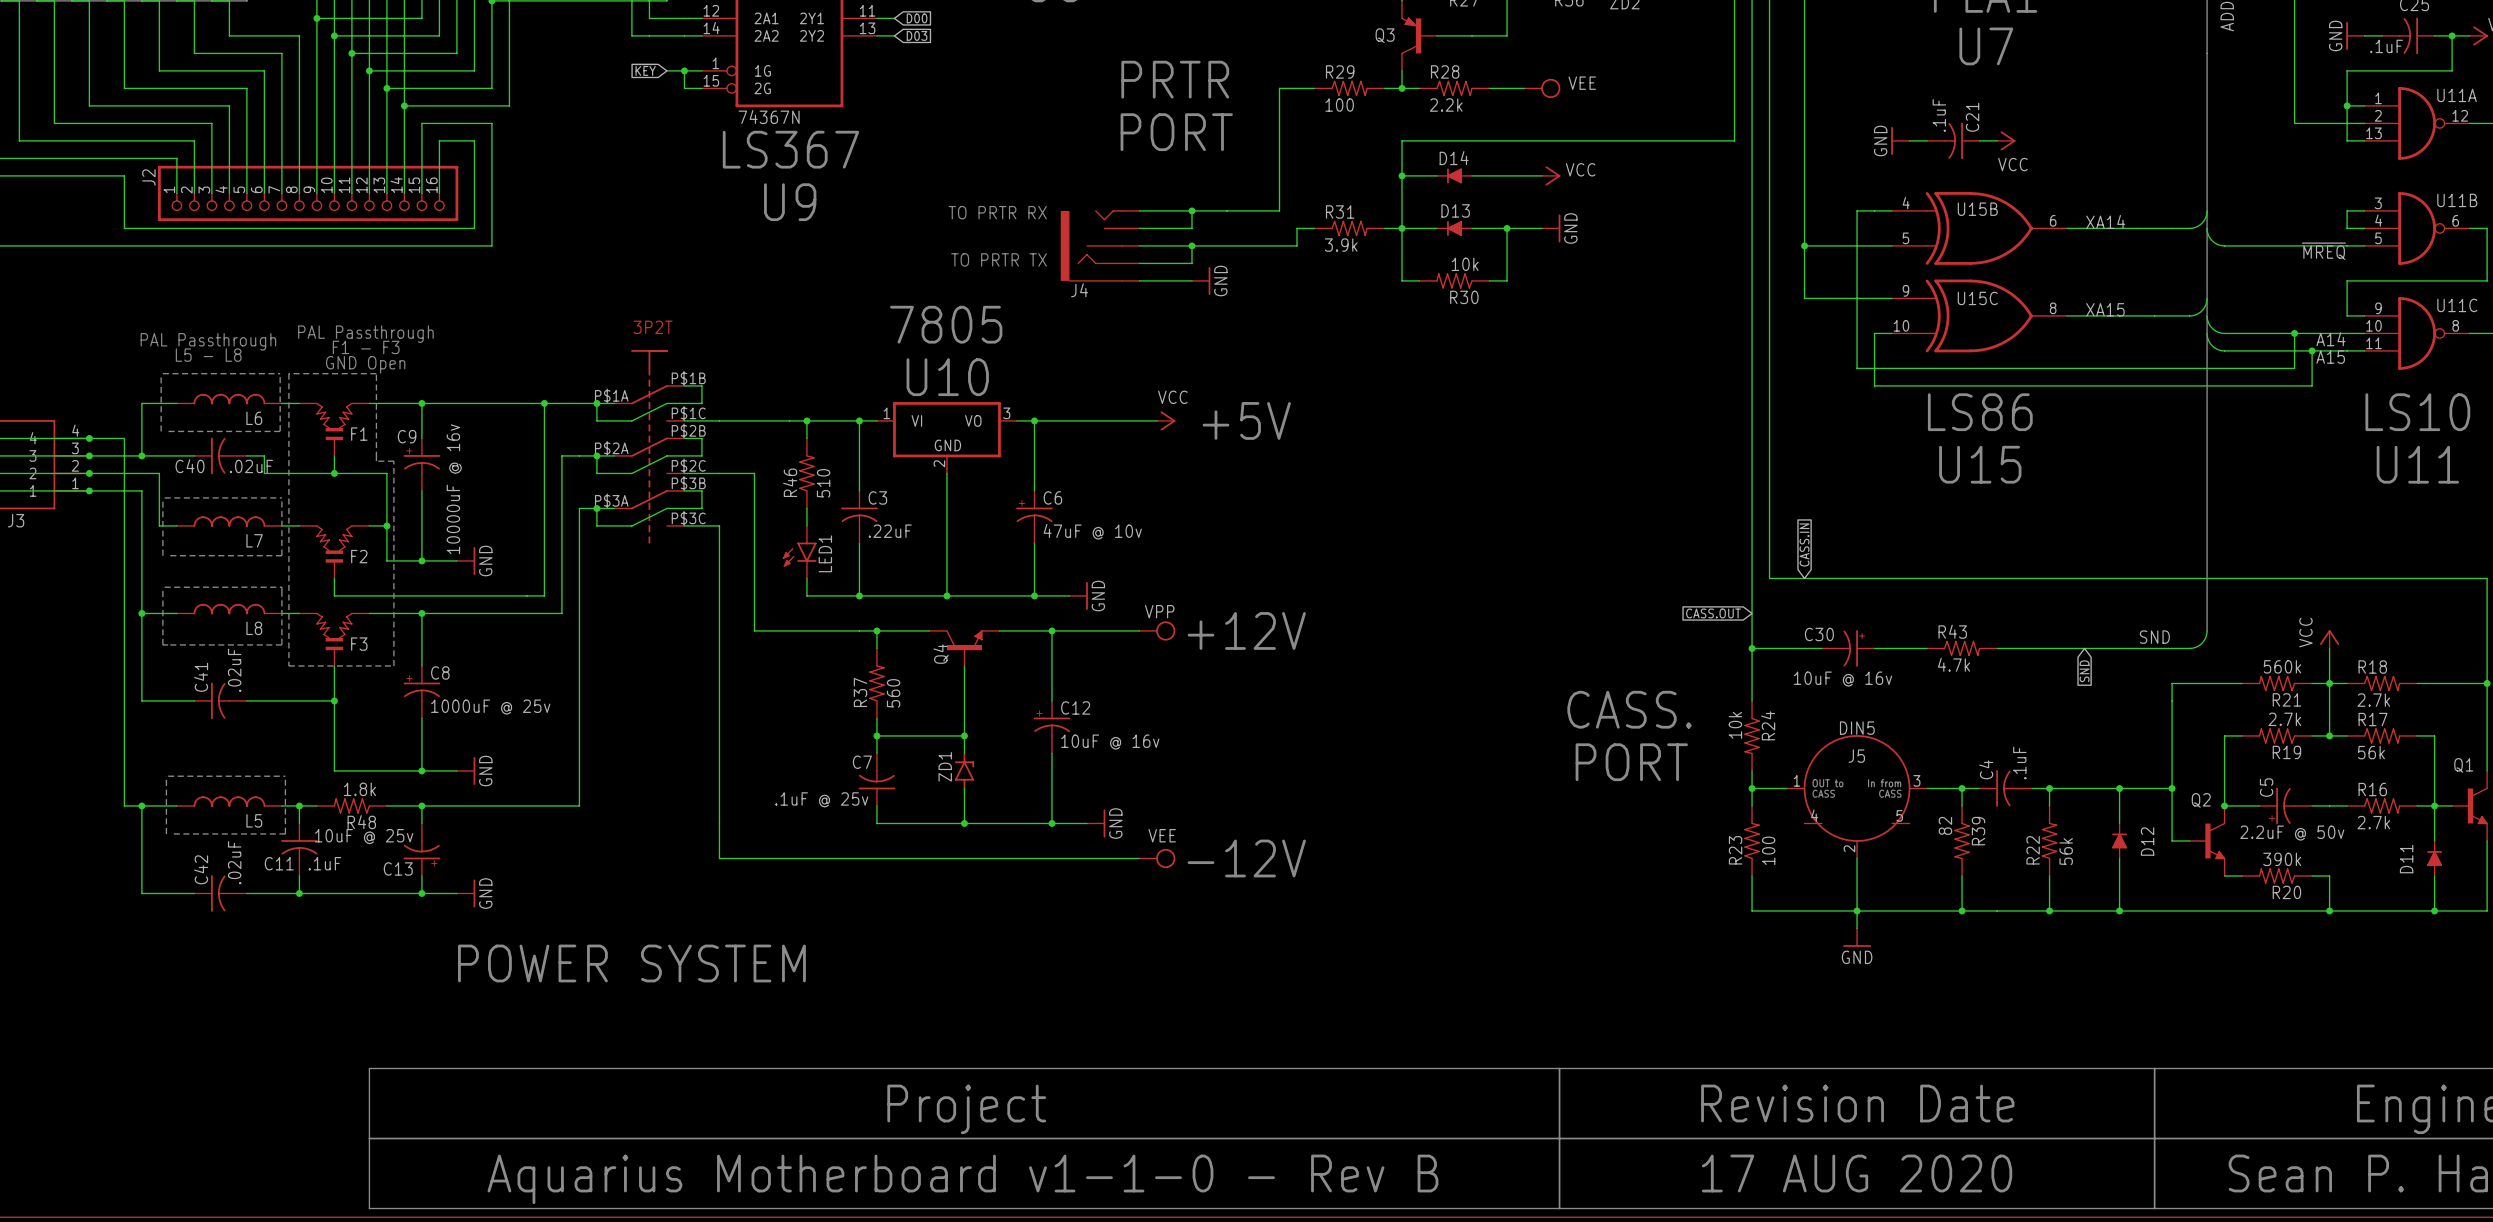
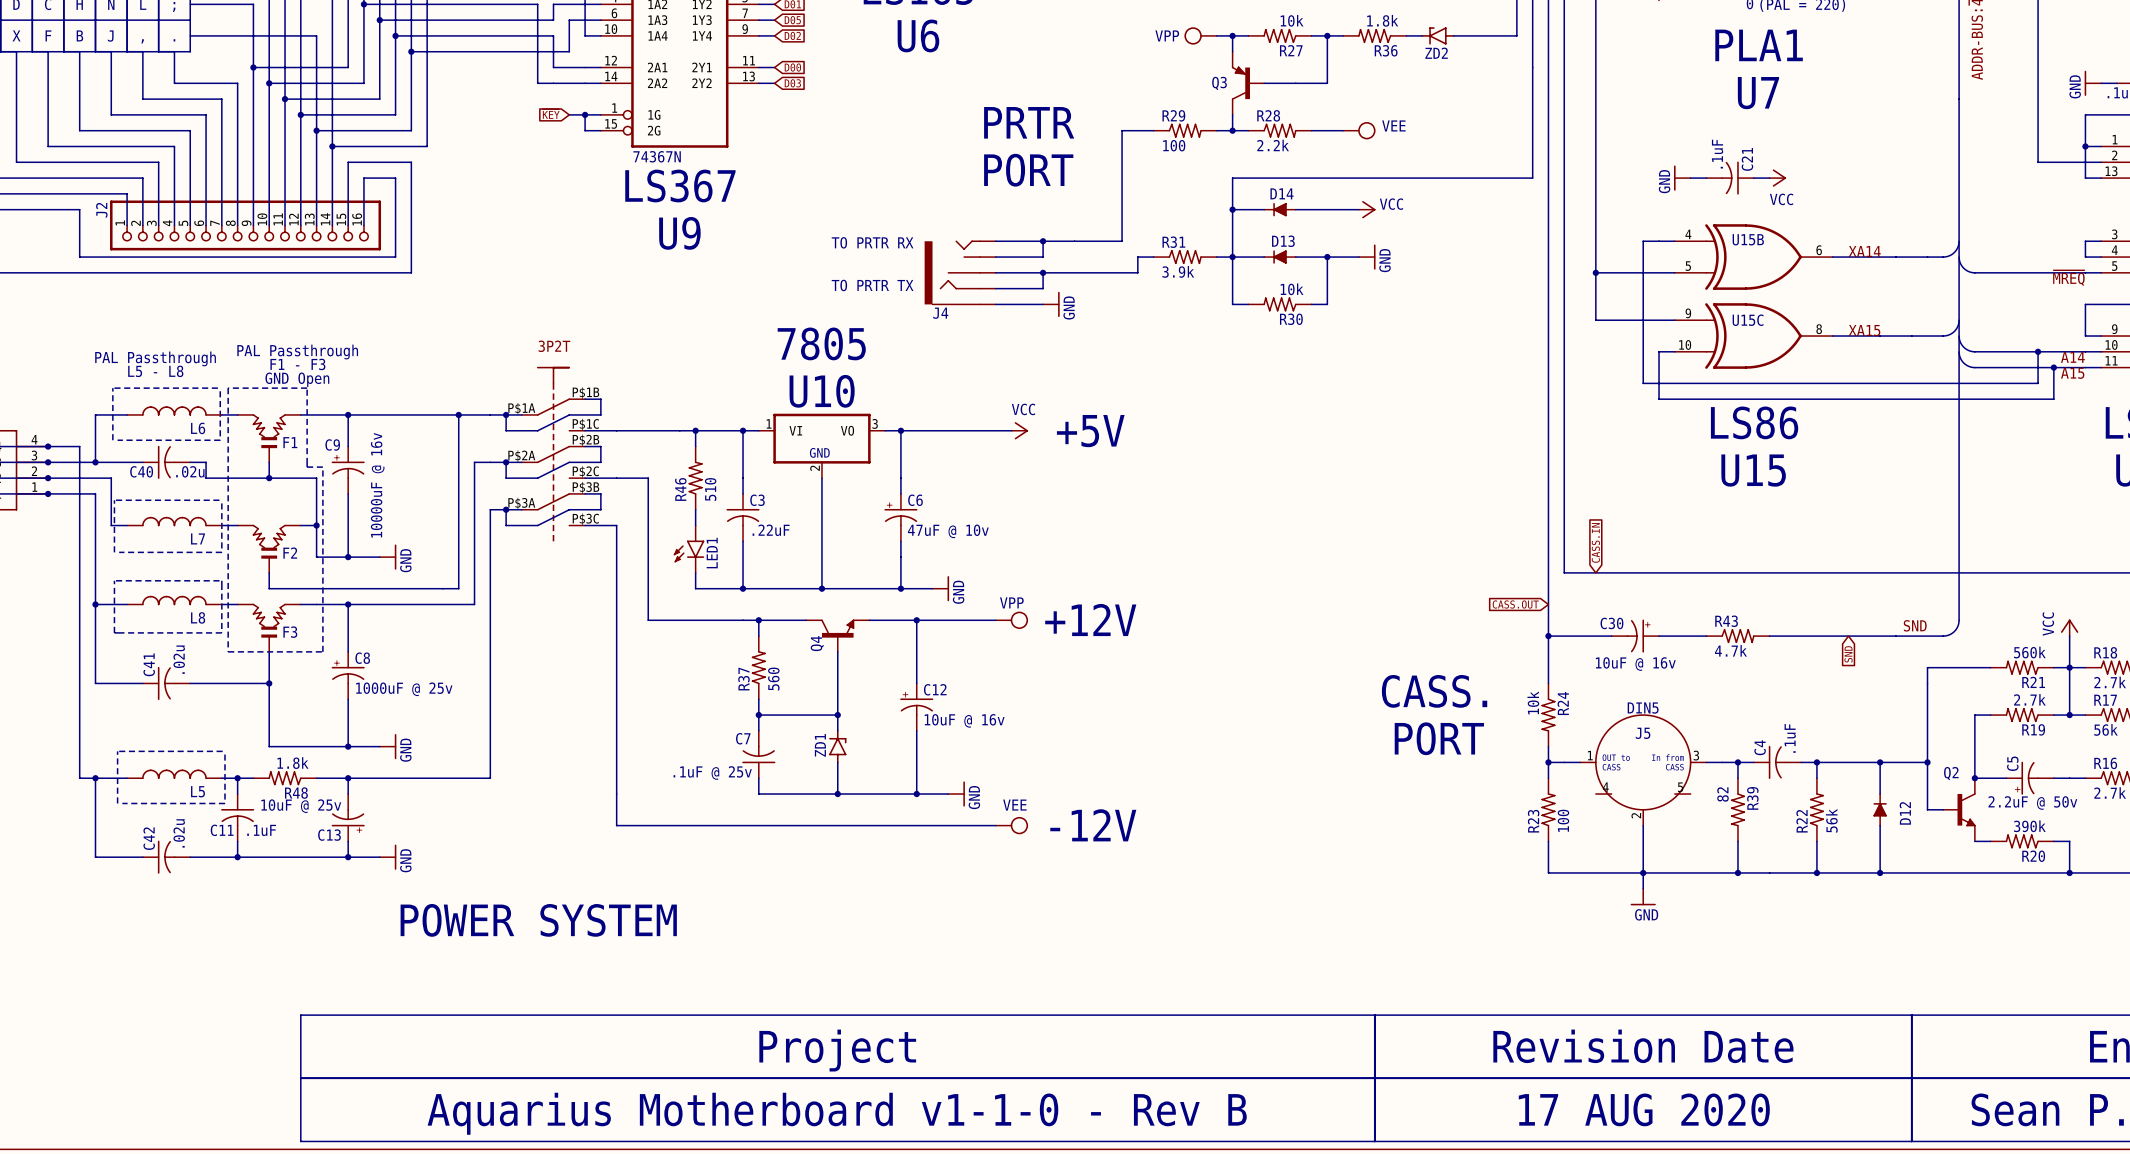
C40 value: .02uF (251, 466) -> .02u (190, 471)
C41 value: .02uF (234, 670) -> .02u (179, 659)
C42 value: .02uF (234, 862) -> .02u (179, 833)

